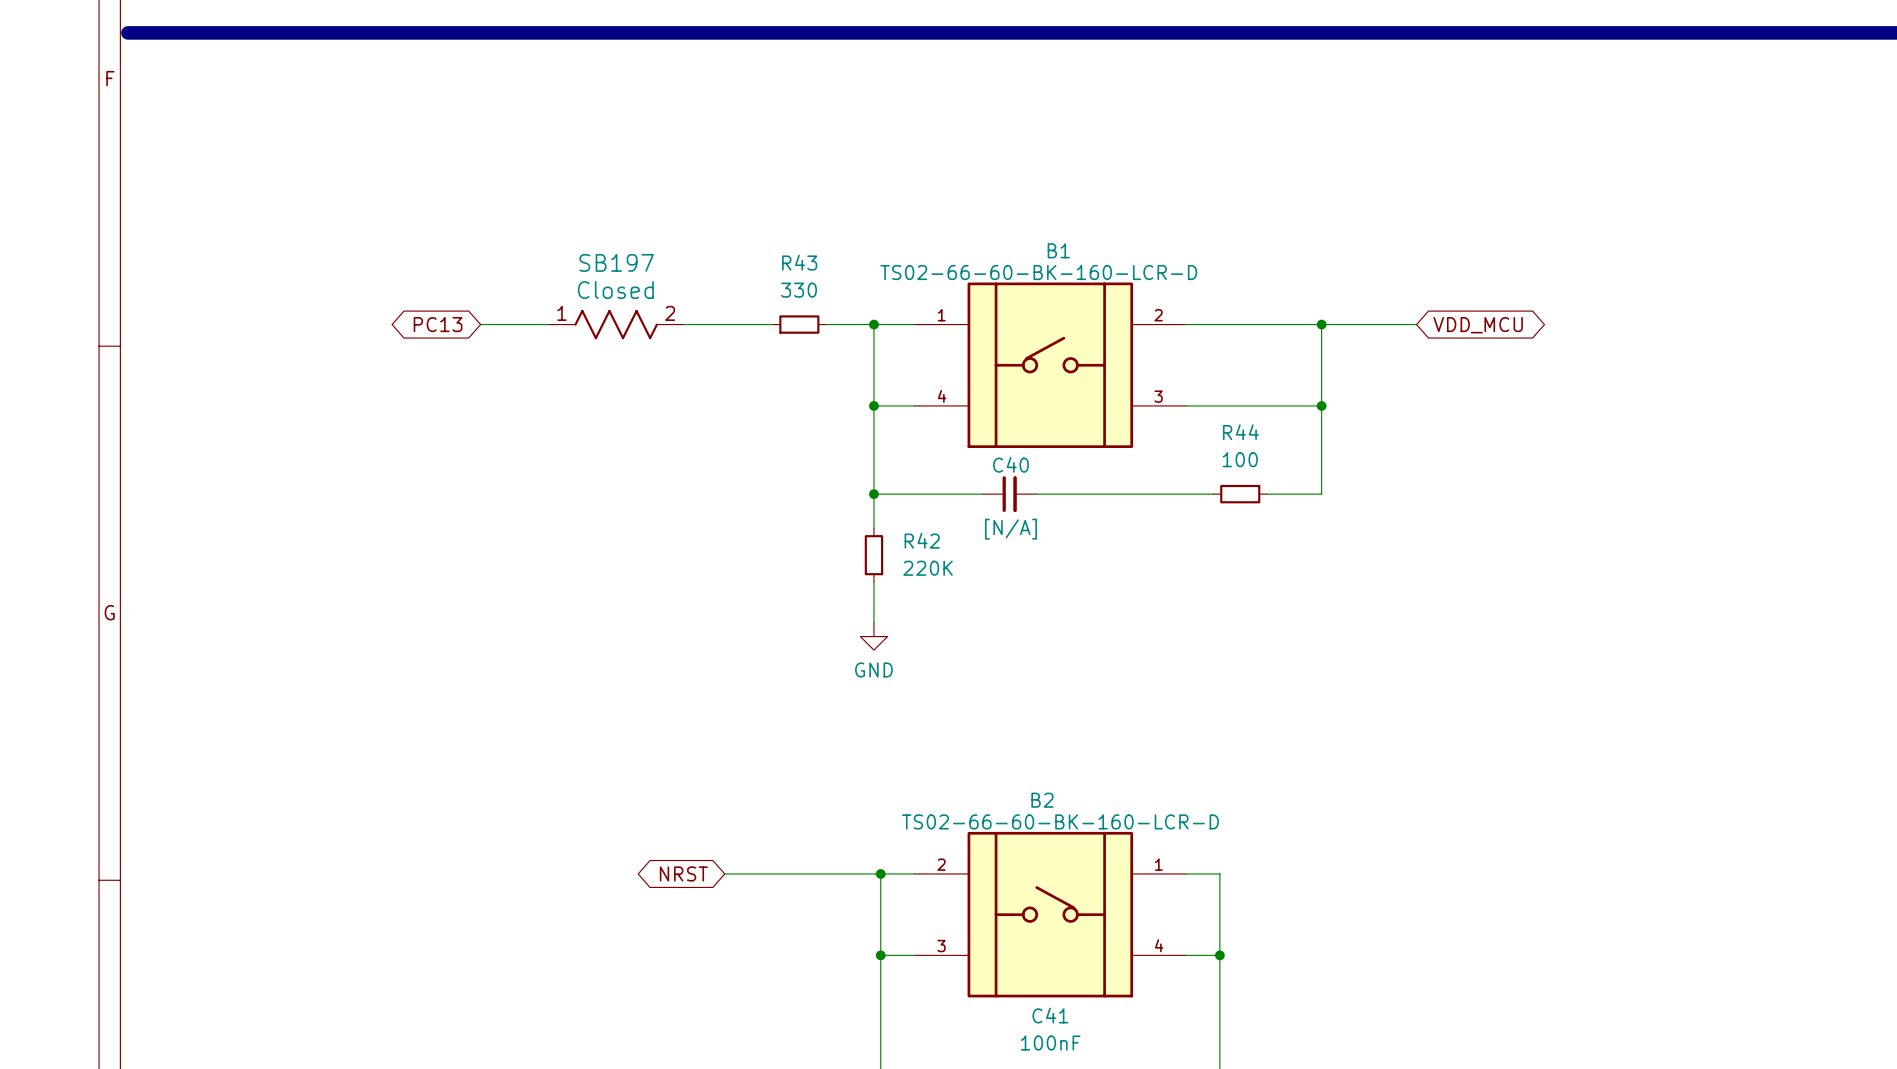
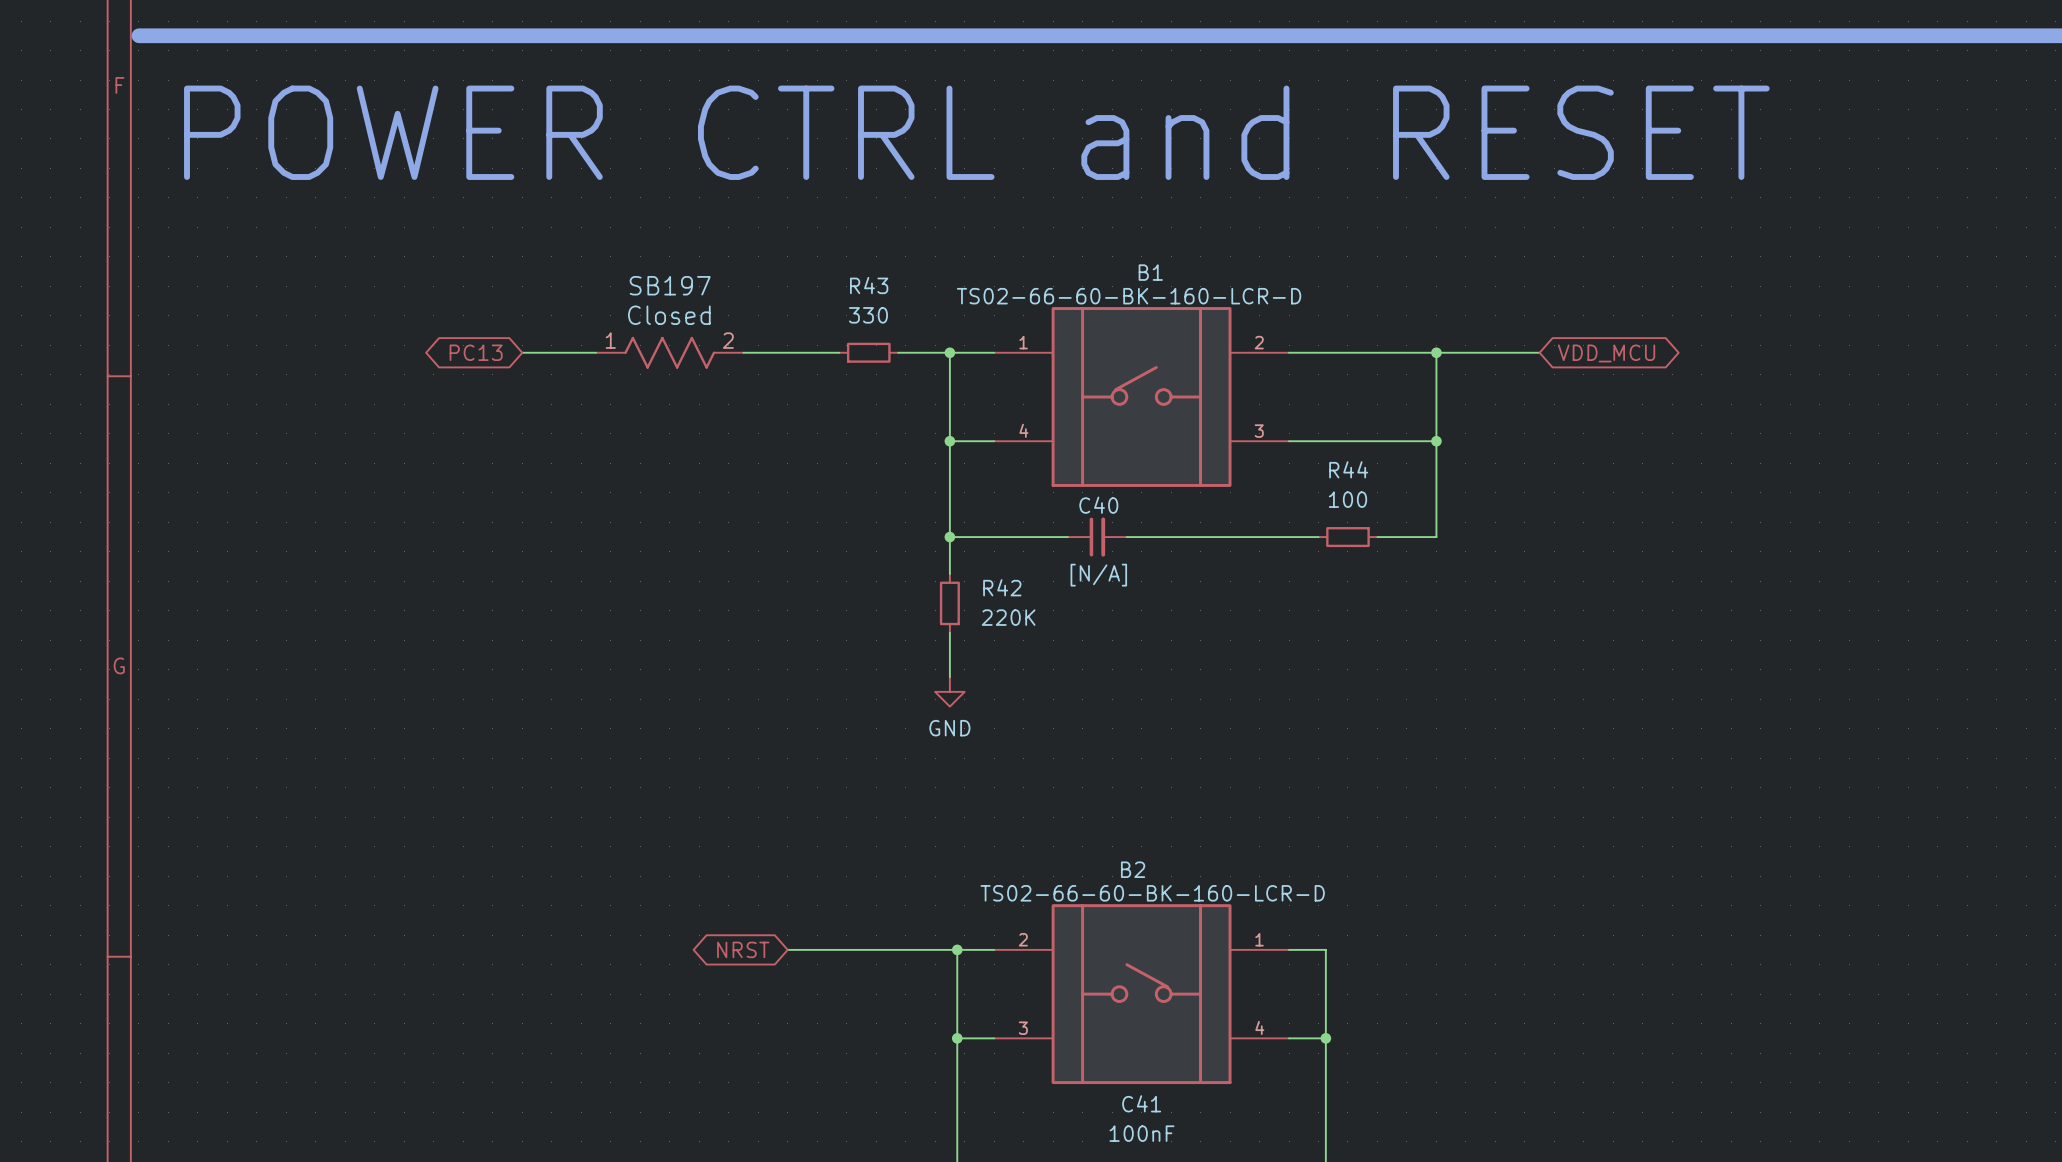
text: none -> POWER CTRL and RESET (976, 132)

